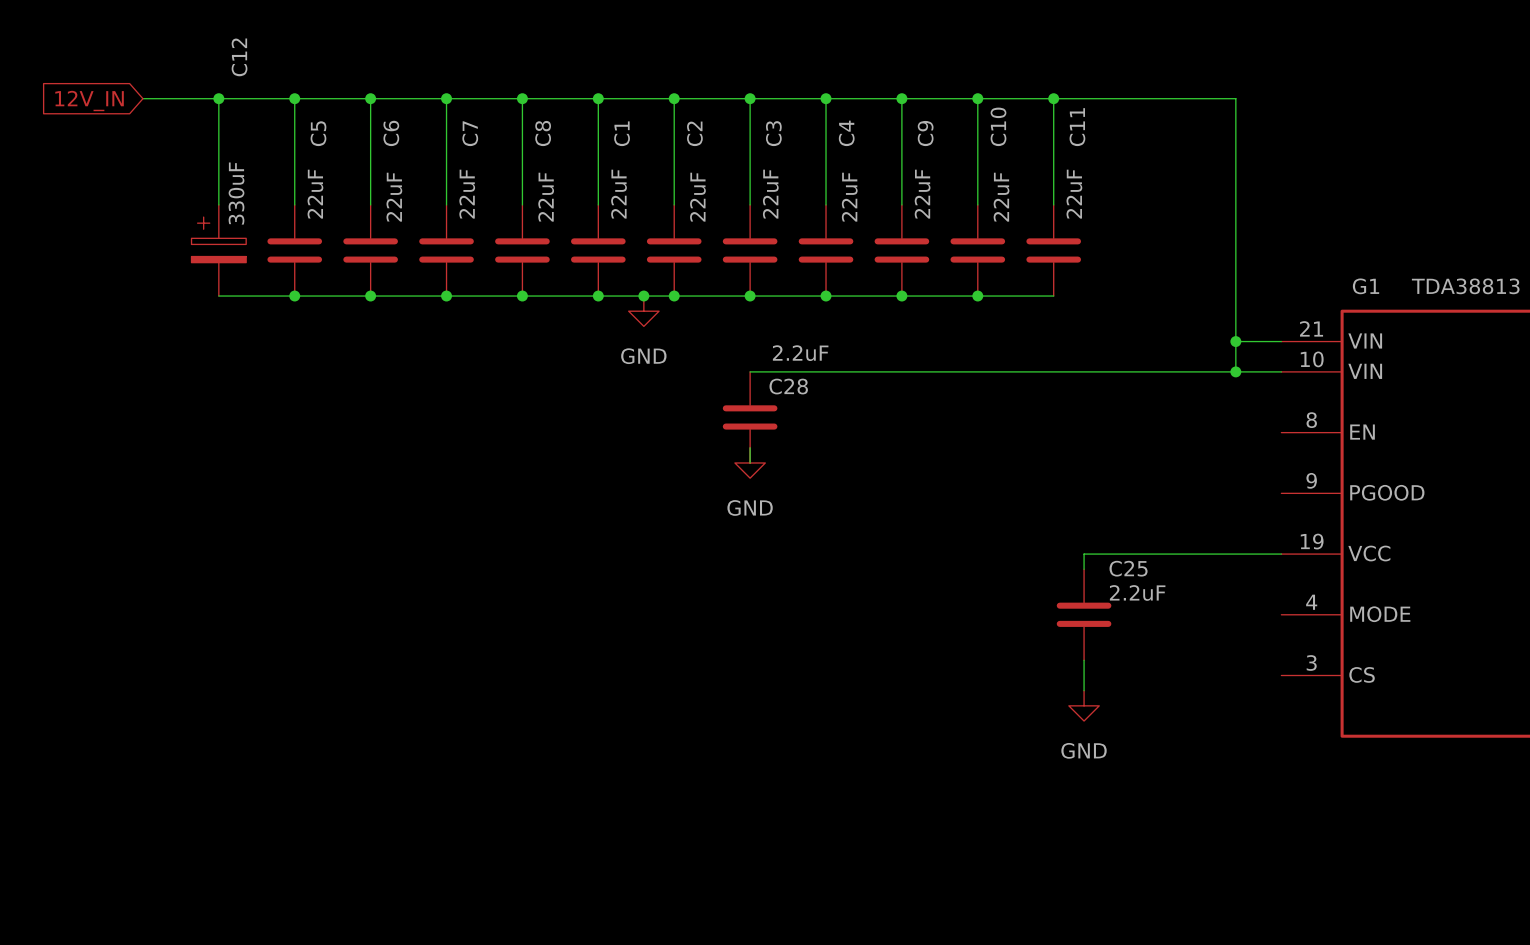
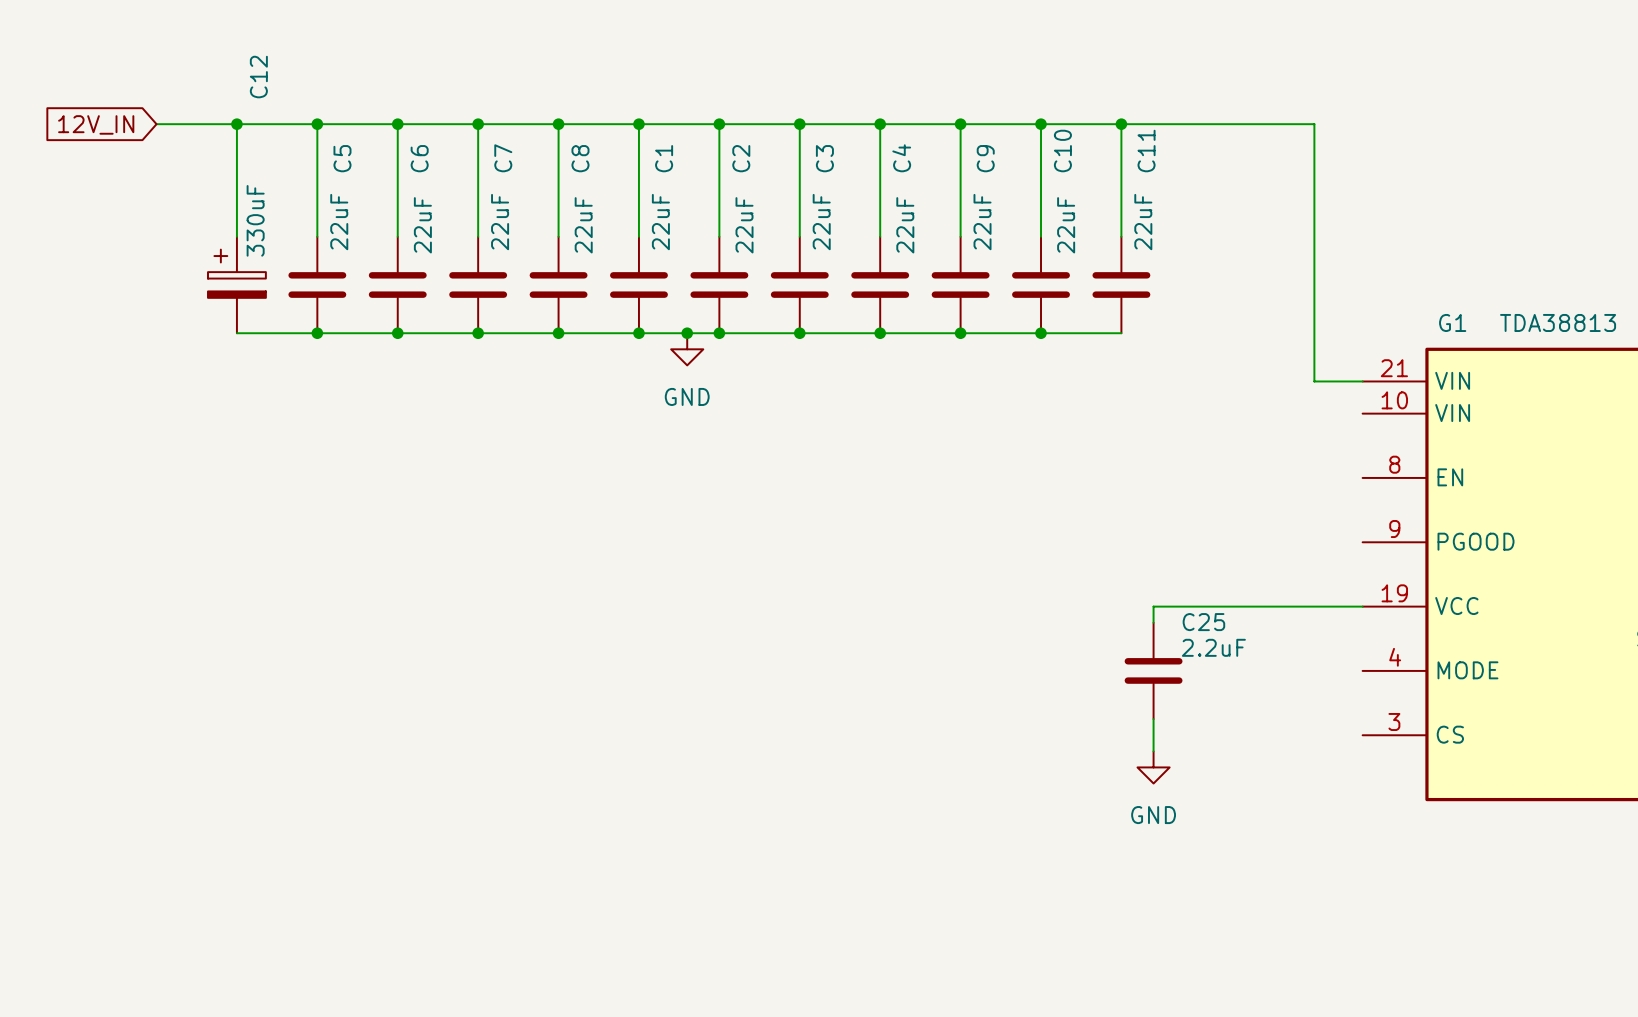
wire: (1235, 341) (1235, 371) -> none
junction: (1235, 341) -> none
wire: (750, 371) (1281, 371) -> none
junction: (1235, 371) -> none
C28: 2.2uF (750, 417) -> none
wire: (750, 447) (750, 462) -> none
power symbol: GND (750, 462) -> none

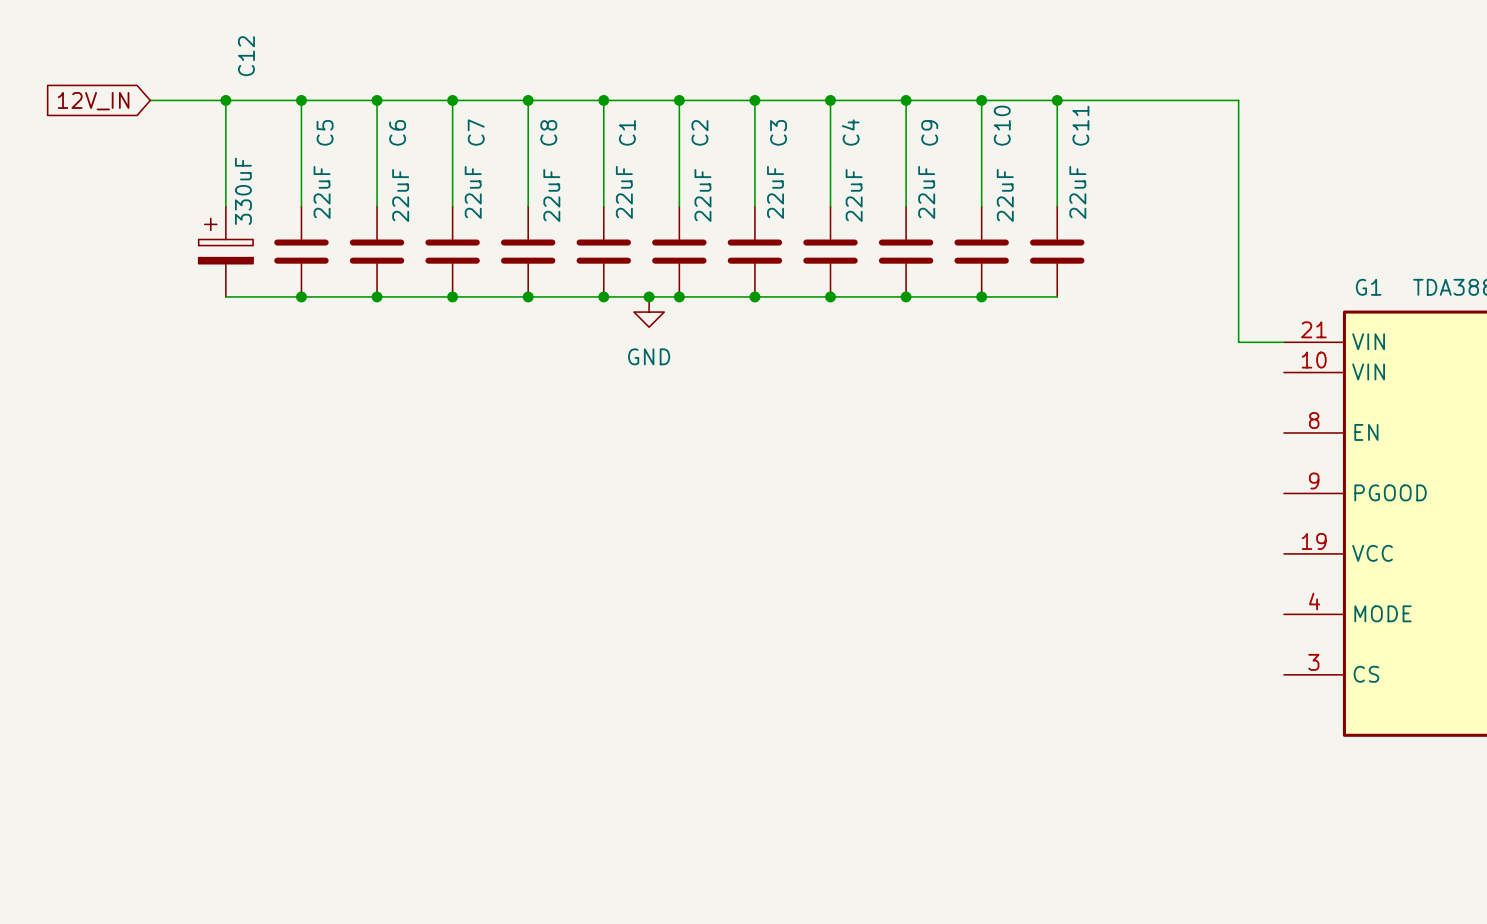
wire: (1362, 606) (1153, 606) (1153, 622) -> none
C25: 2.2uF (1153, 670) -> none
wire: (1153, 719) (1153, 751) -> none
power symbol: GND (1153, 767) -> none

